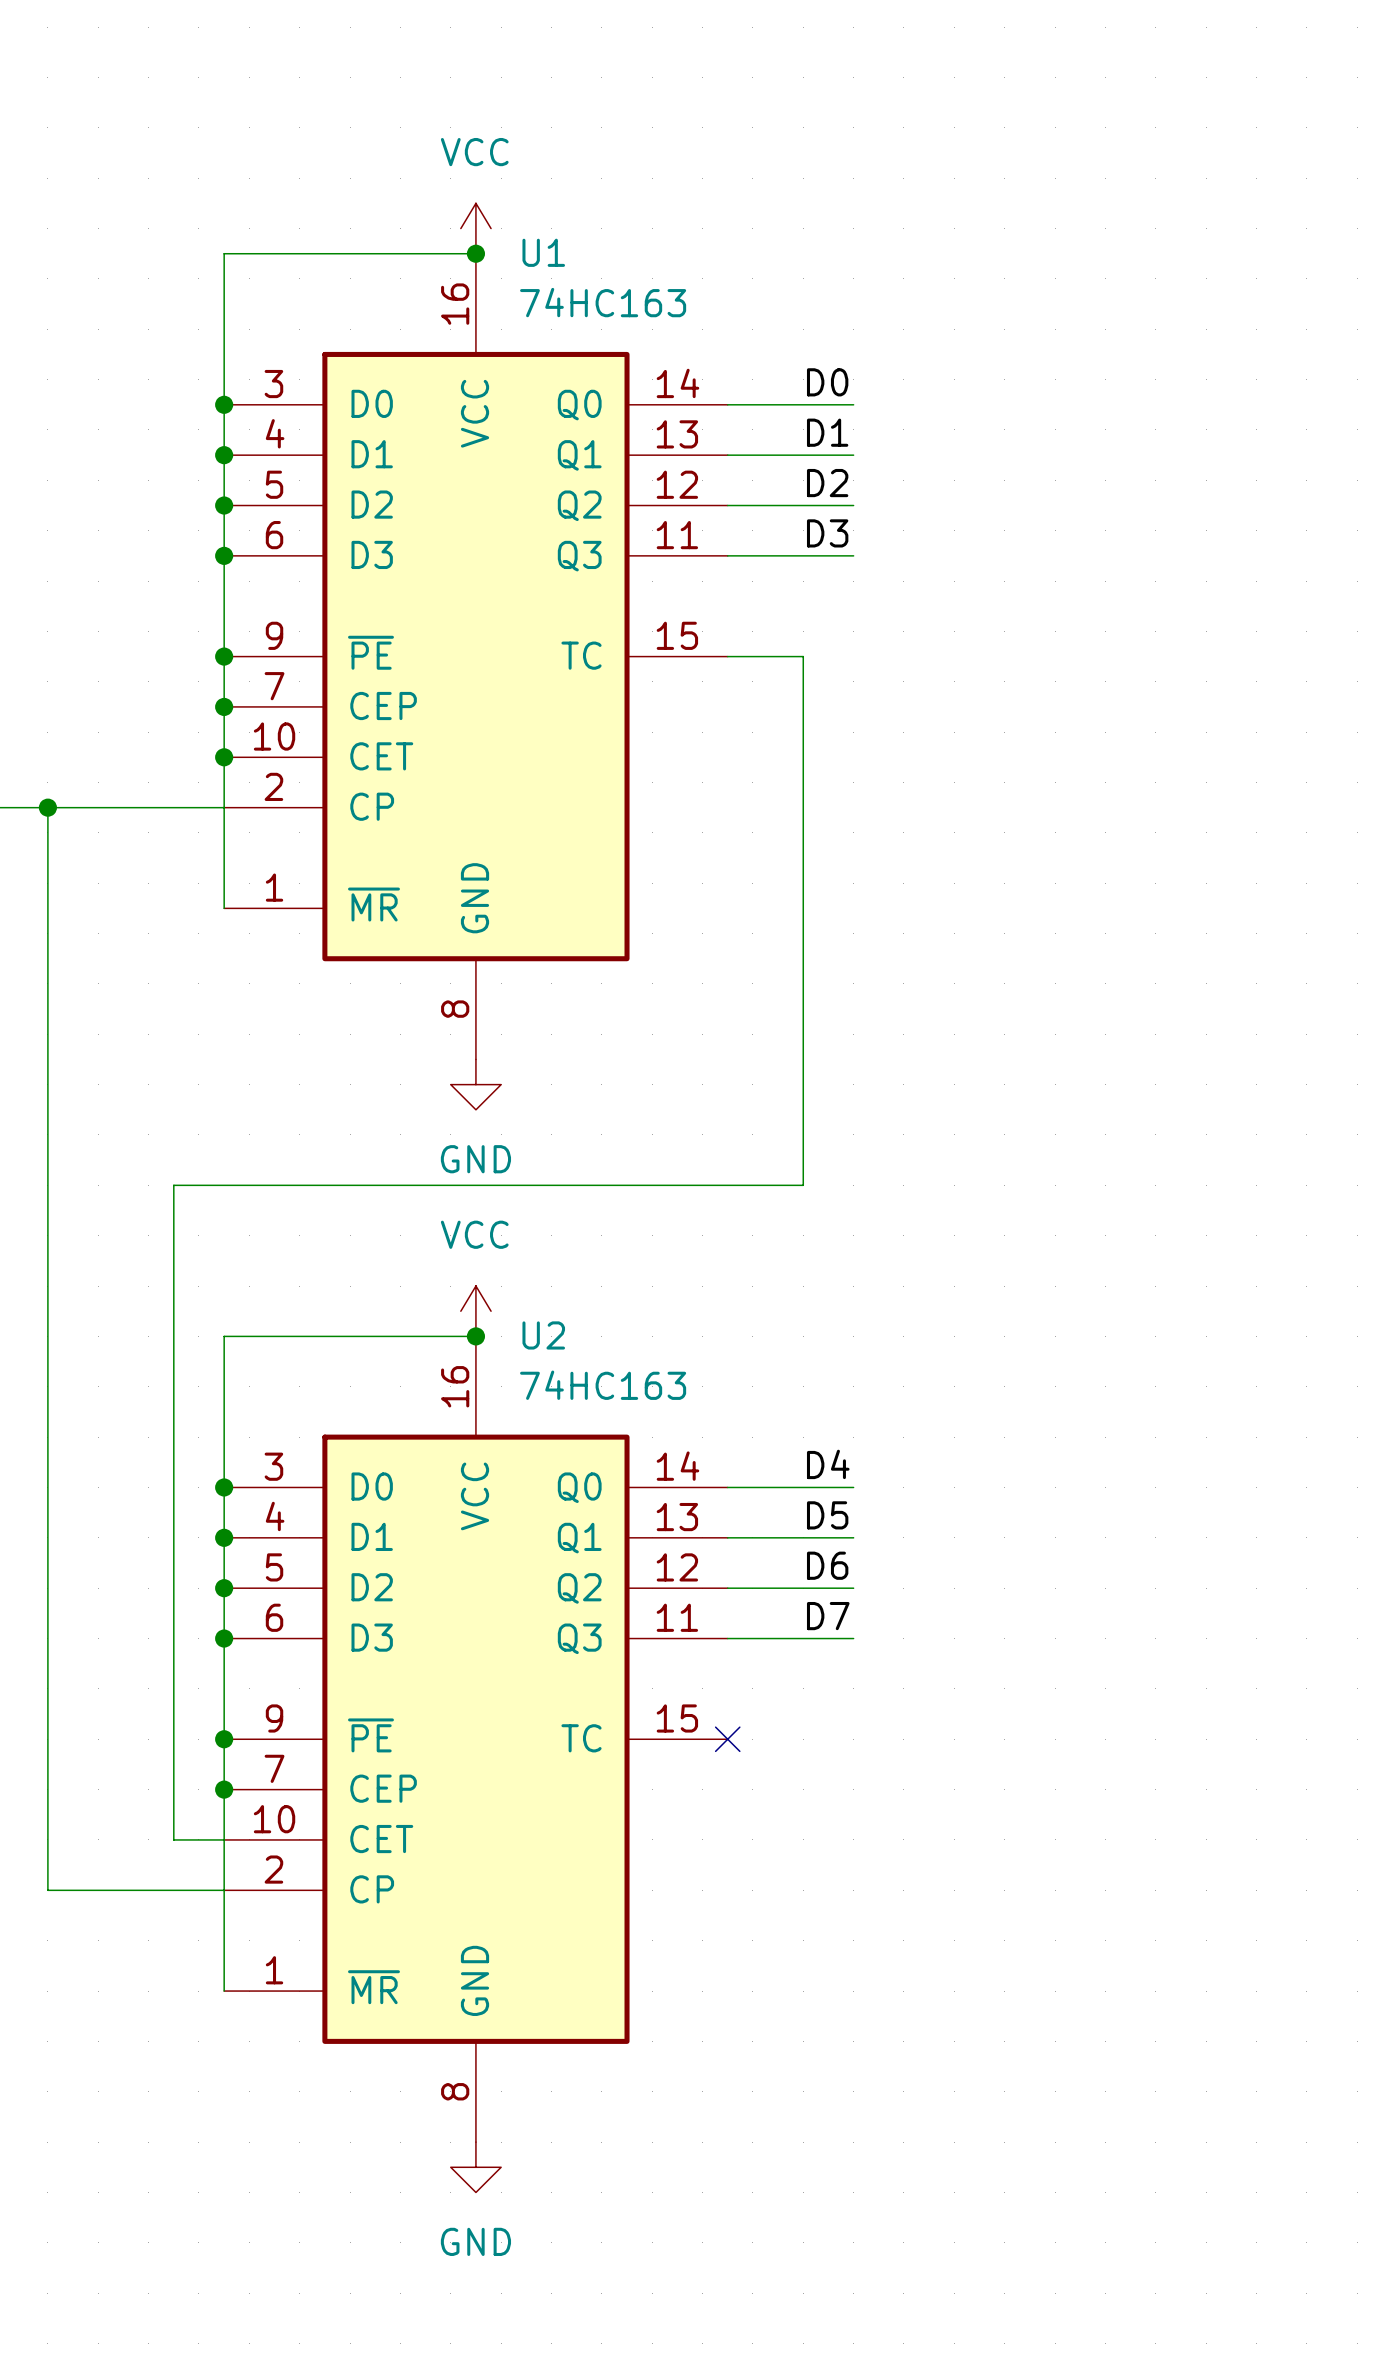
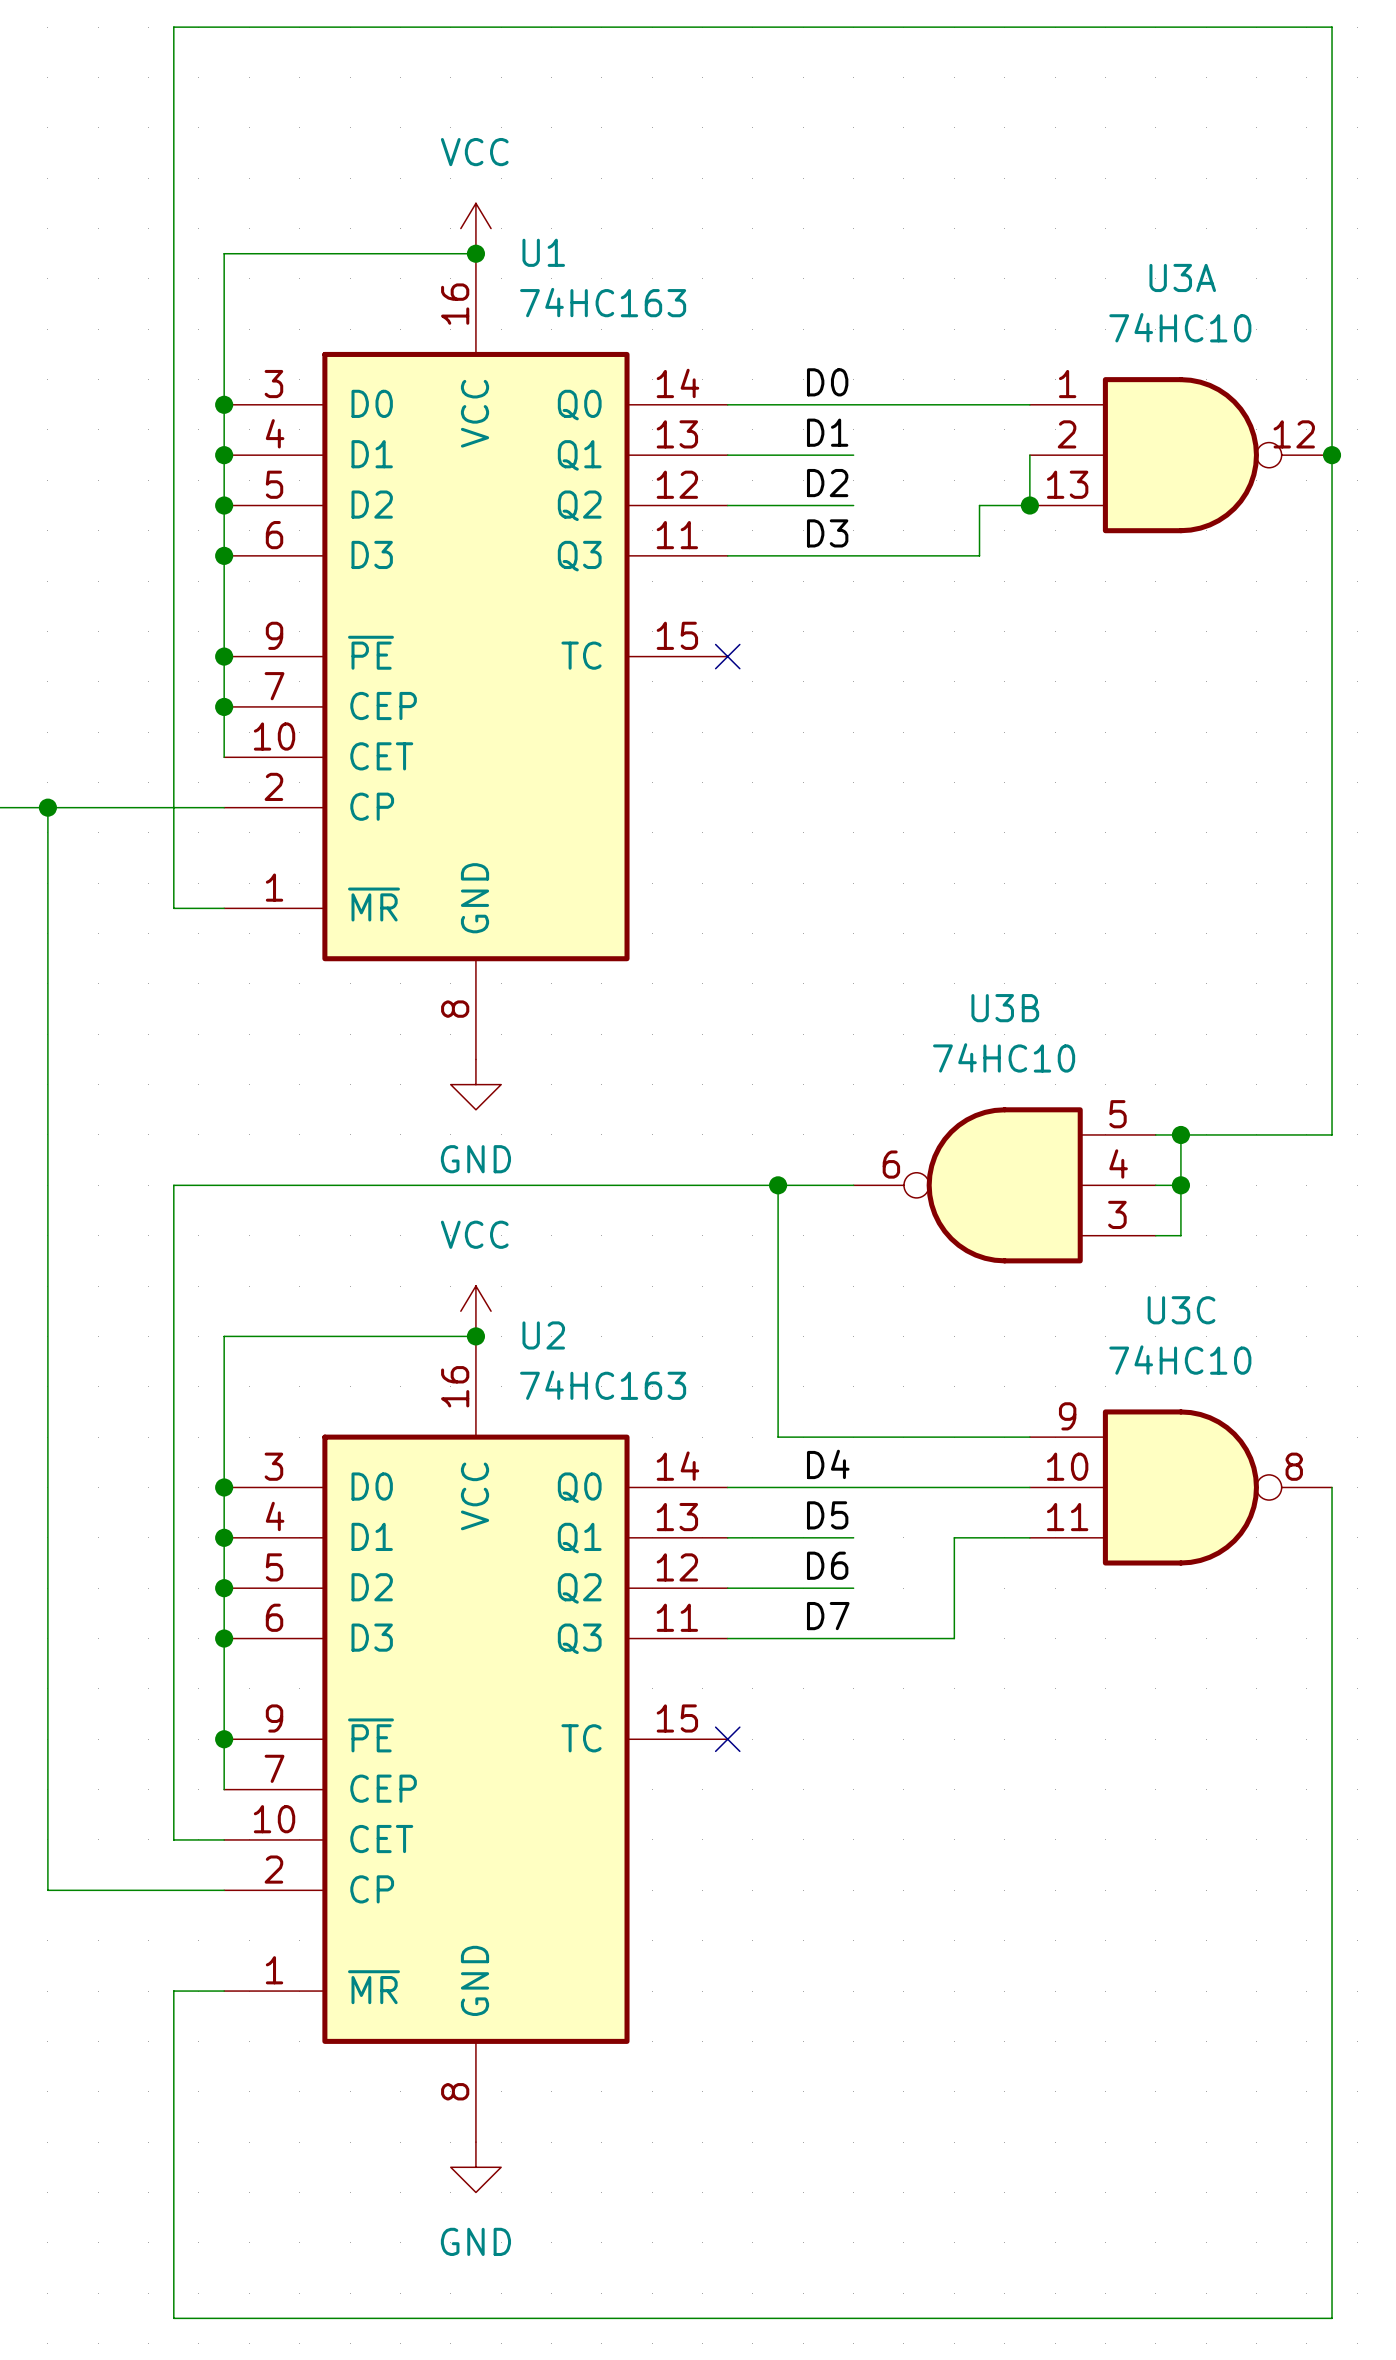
wire: none -> (853, 404) (1029, 404)
wire: none -> (1029, 455) (1029, 505) (979, 505) (979, 555) (853, 555)
U3A: none -> 74HC10 (1180, 455)
junction: none -> (1332, 455)
junction: none -> (1029, 505)
wire: (727, 656) (803, 656) (803, 1185) -> (853, 1185) (803, 1185)
no-connect mark: none -> (727, 656)
wire: (224, 757) (224, 908) -> (1155, 1134) (1332, 1134) (1332, 27) (173, 27) (173, 908) (224, 908)
junction: (224, 757) -> none
wire: none -> (1180, 1134) (1180, 1235) (1155, 1235)
junction: none -> (1180, 1134)
wire: none -> (778, 1185) (778, 1437) (1029, 1437)
junction: none -> (778, 1185)
U3B: none -> 74HC10 (1004, 1185)
wire: none -> (1155, 1185) (1180, 1185)
junction: none -> (1180, 1185)
wire: none -> (853, 1487) (1029, 1487)
U3C: none -> 74HC10 (1180, 1487)
wire: none -> (1029, 1537) (954, 1537) (954, 1638) (853, 1638)
wire: (224, 1789) (224, 1991) -> (1332, 1487) (1332, 2318) (173, 2318) (173, 1991) (224, 1991)
junction: (224, 1789) -> none

